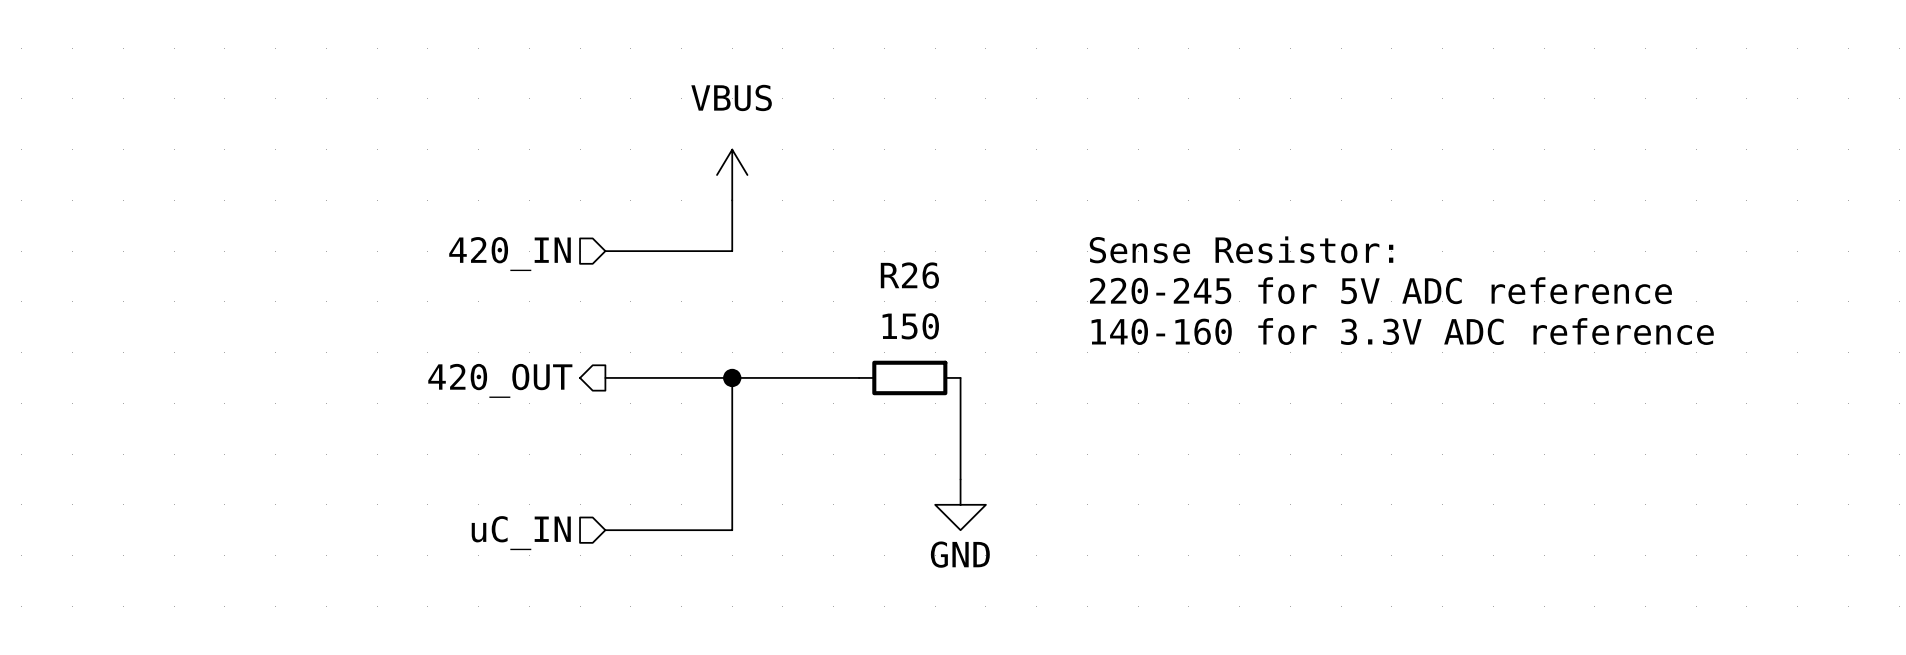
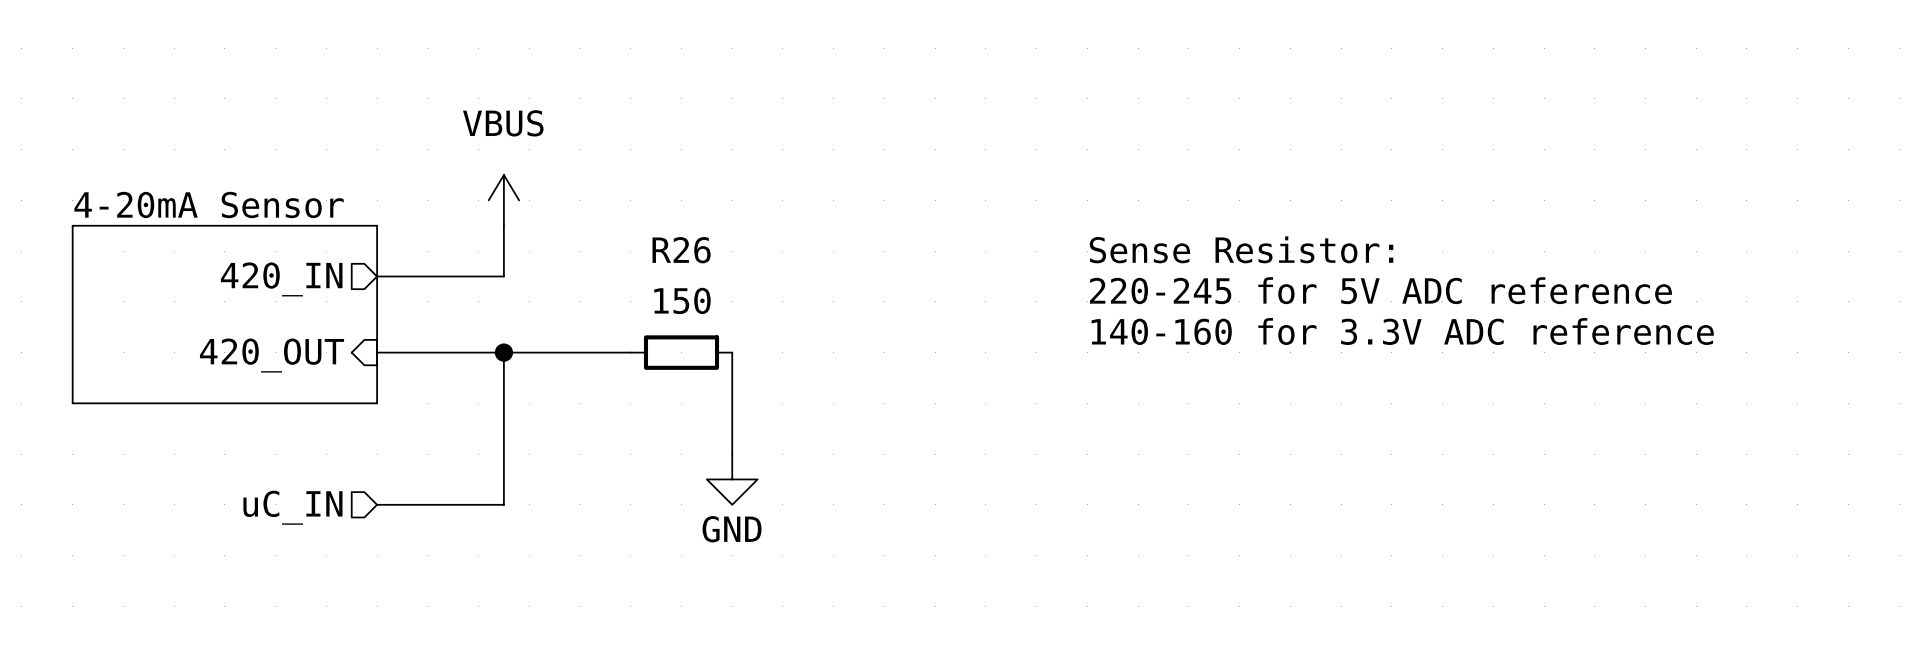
power symbol position: VBUS (732, 175) -> VBUS (503, 200)
wire: (732, 200) (732, 251) (605, 251) -> (503, 225) (503, 276) (377, 276)
text: none -> 4-20mA Sensor (209, 204)
line: none -> (72, 225) (377, 225) (377, 403) (72, 403) (72, 225)
hierarchical label position: 420_IN (510, 254) -> 420_IN (281, 279)
wire: none -> (503, 352) (503, 504) (377, 504)
junction: none -> (503, 352)
wire: none -> (732, 352) (732, 377)
wire: (605, 377) (859, 377) -> (377, 352) (630, 352)
junction: (732, 377) -> none
R26 position: (909, 377) -> (681, 352)
wire: (960, 377) (960, 479) -> none
hierarchical label position: 420_OUT (500, 380) -> 420_OUT (272, 355)
wire: (732, 454) (732, 530) (605, 530) -> none
power symbol position: GND (960, 504) -> GND (732, 479)
hierarchical label position: uC_IN (521, 533) -> uC_IN (292, 507)

